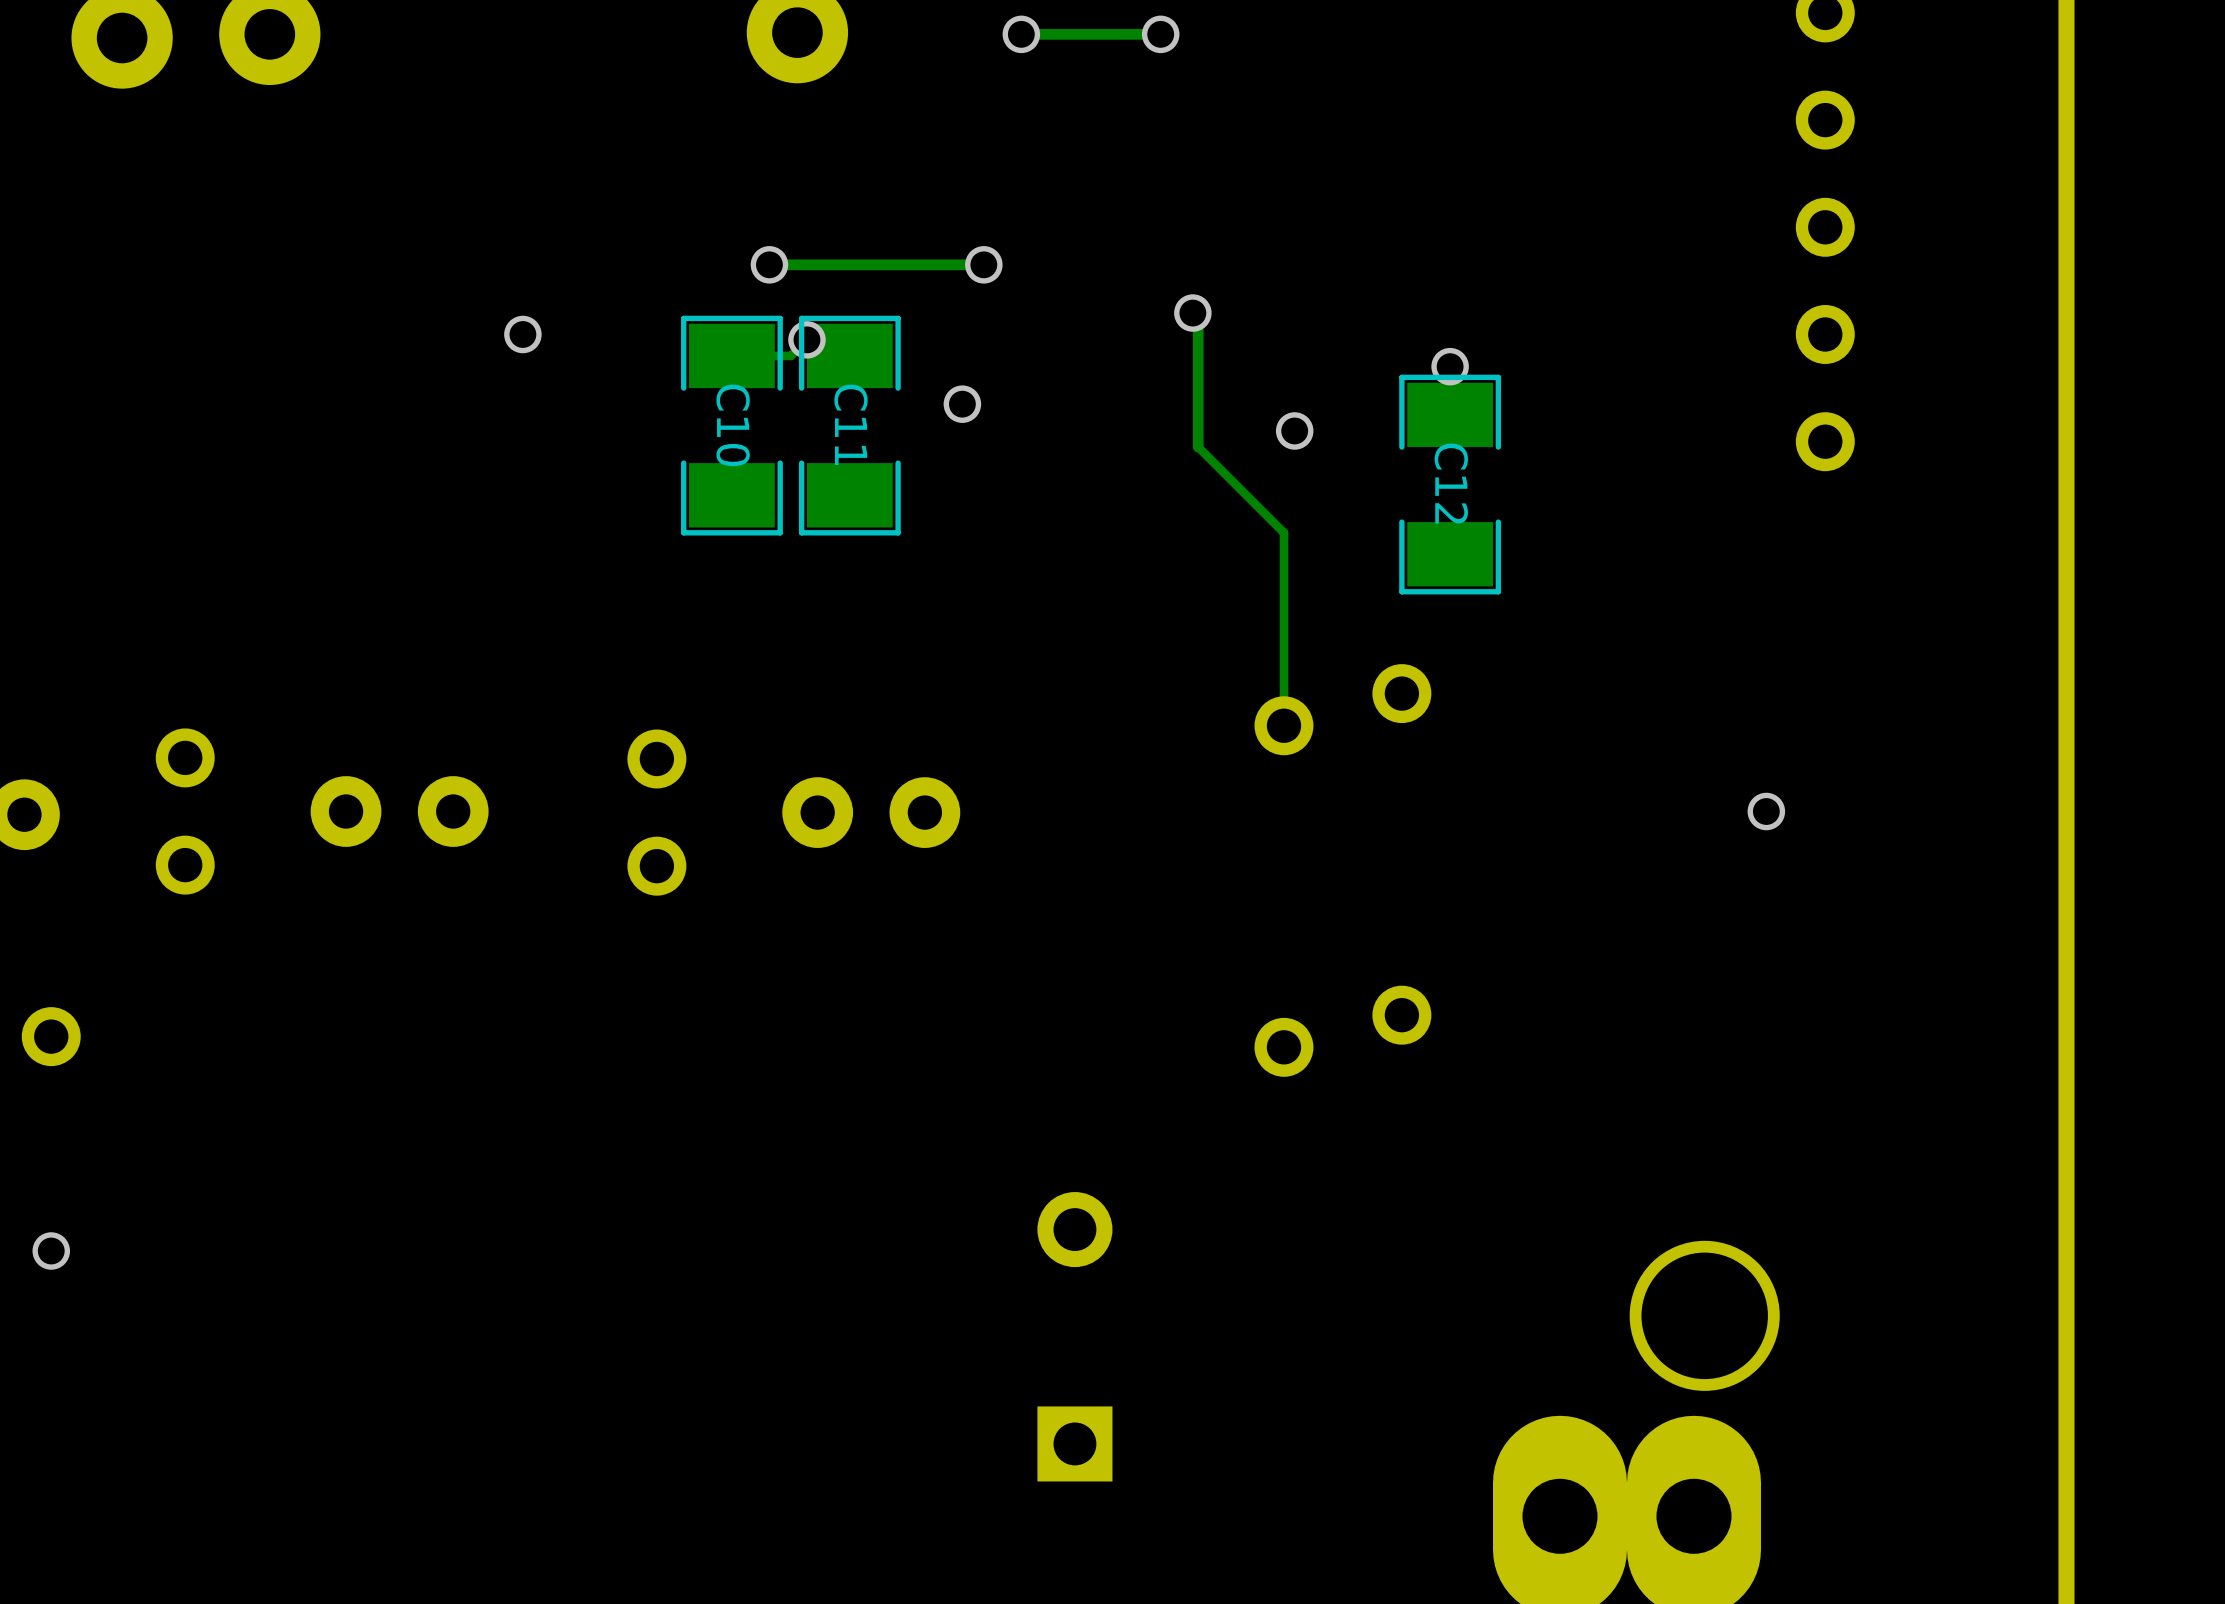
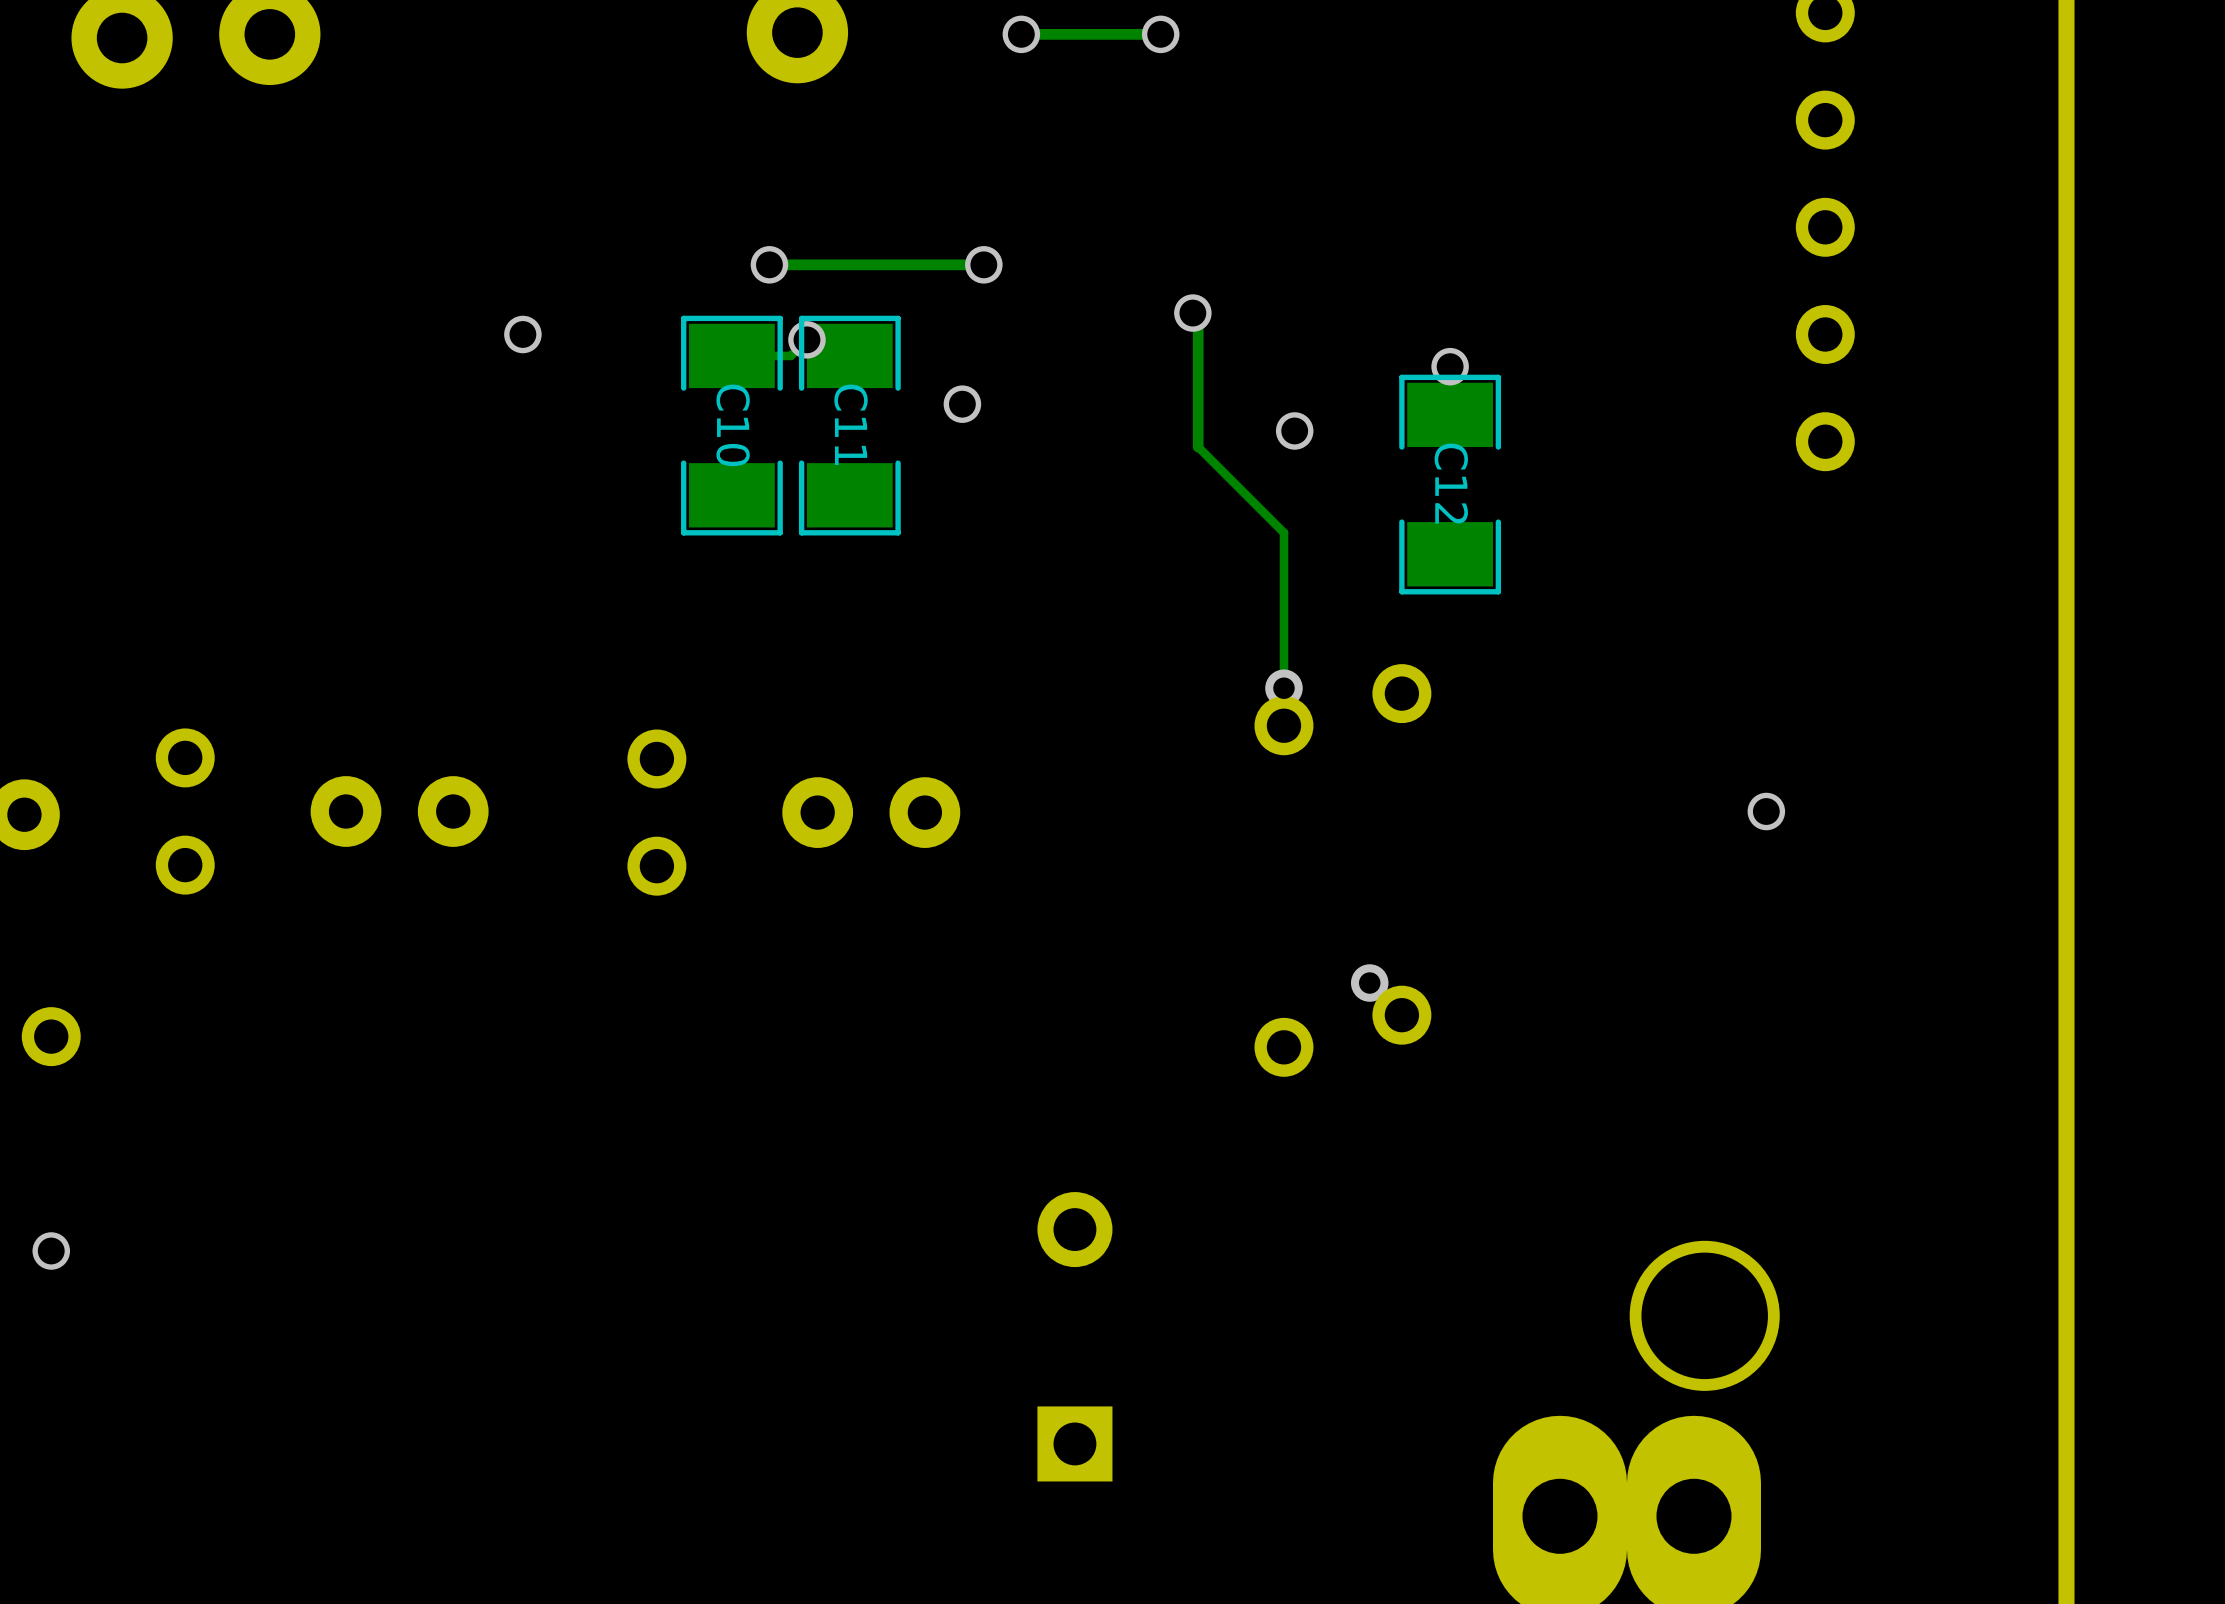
via: none -> (1283, 688)
via: none -> (1369, 983)

